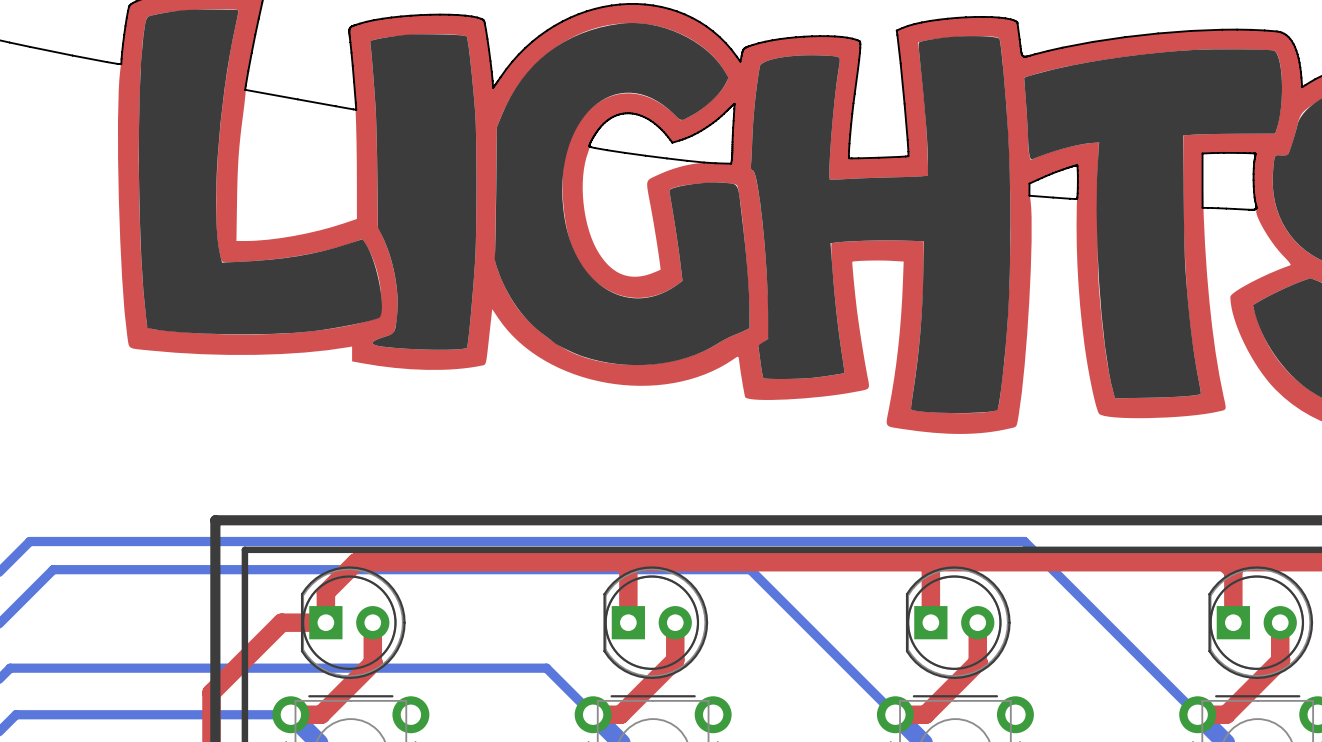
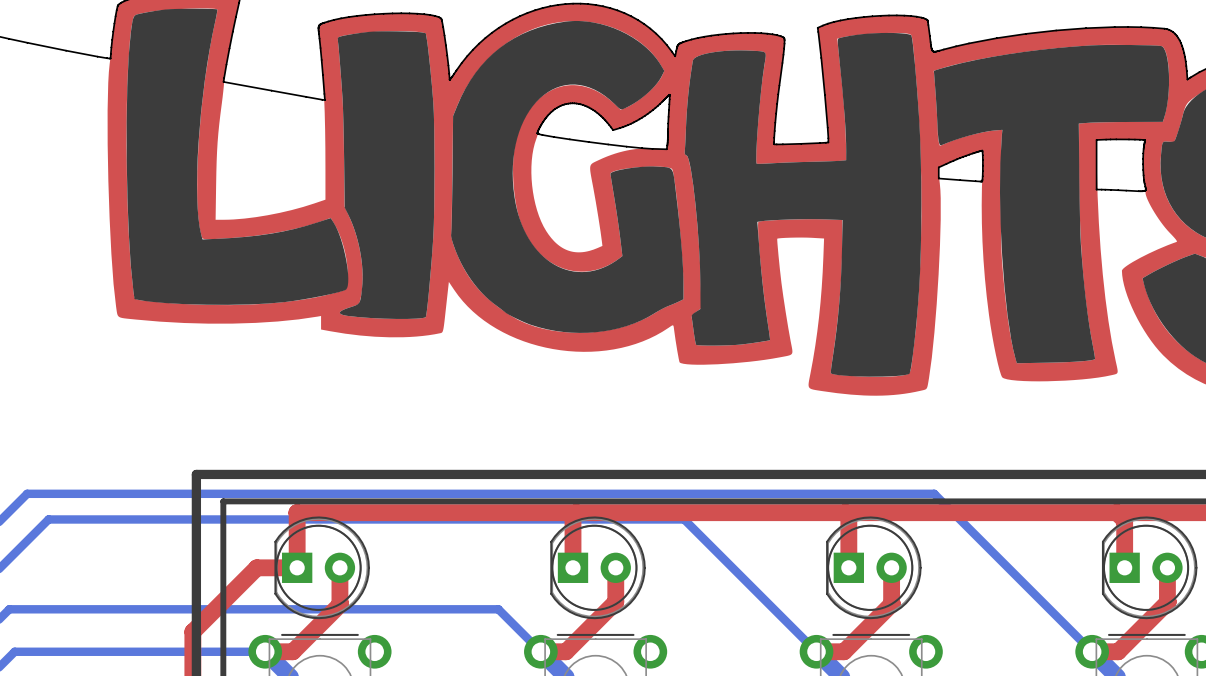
top track: (356, 562) (325, 592) -> (324, 512) (296, 512) (297, 540)

